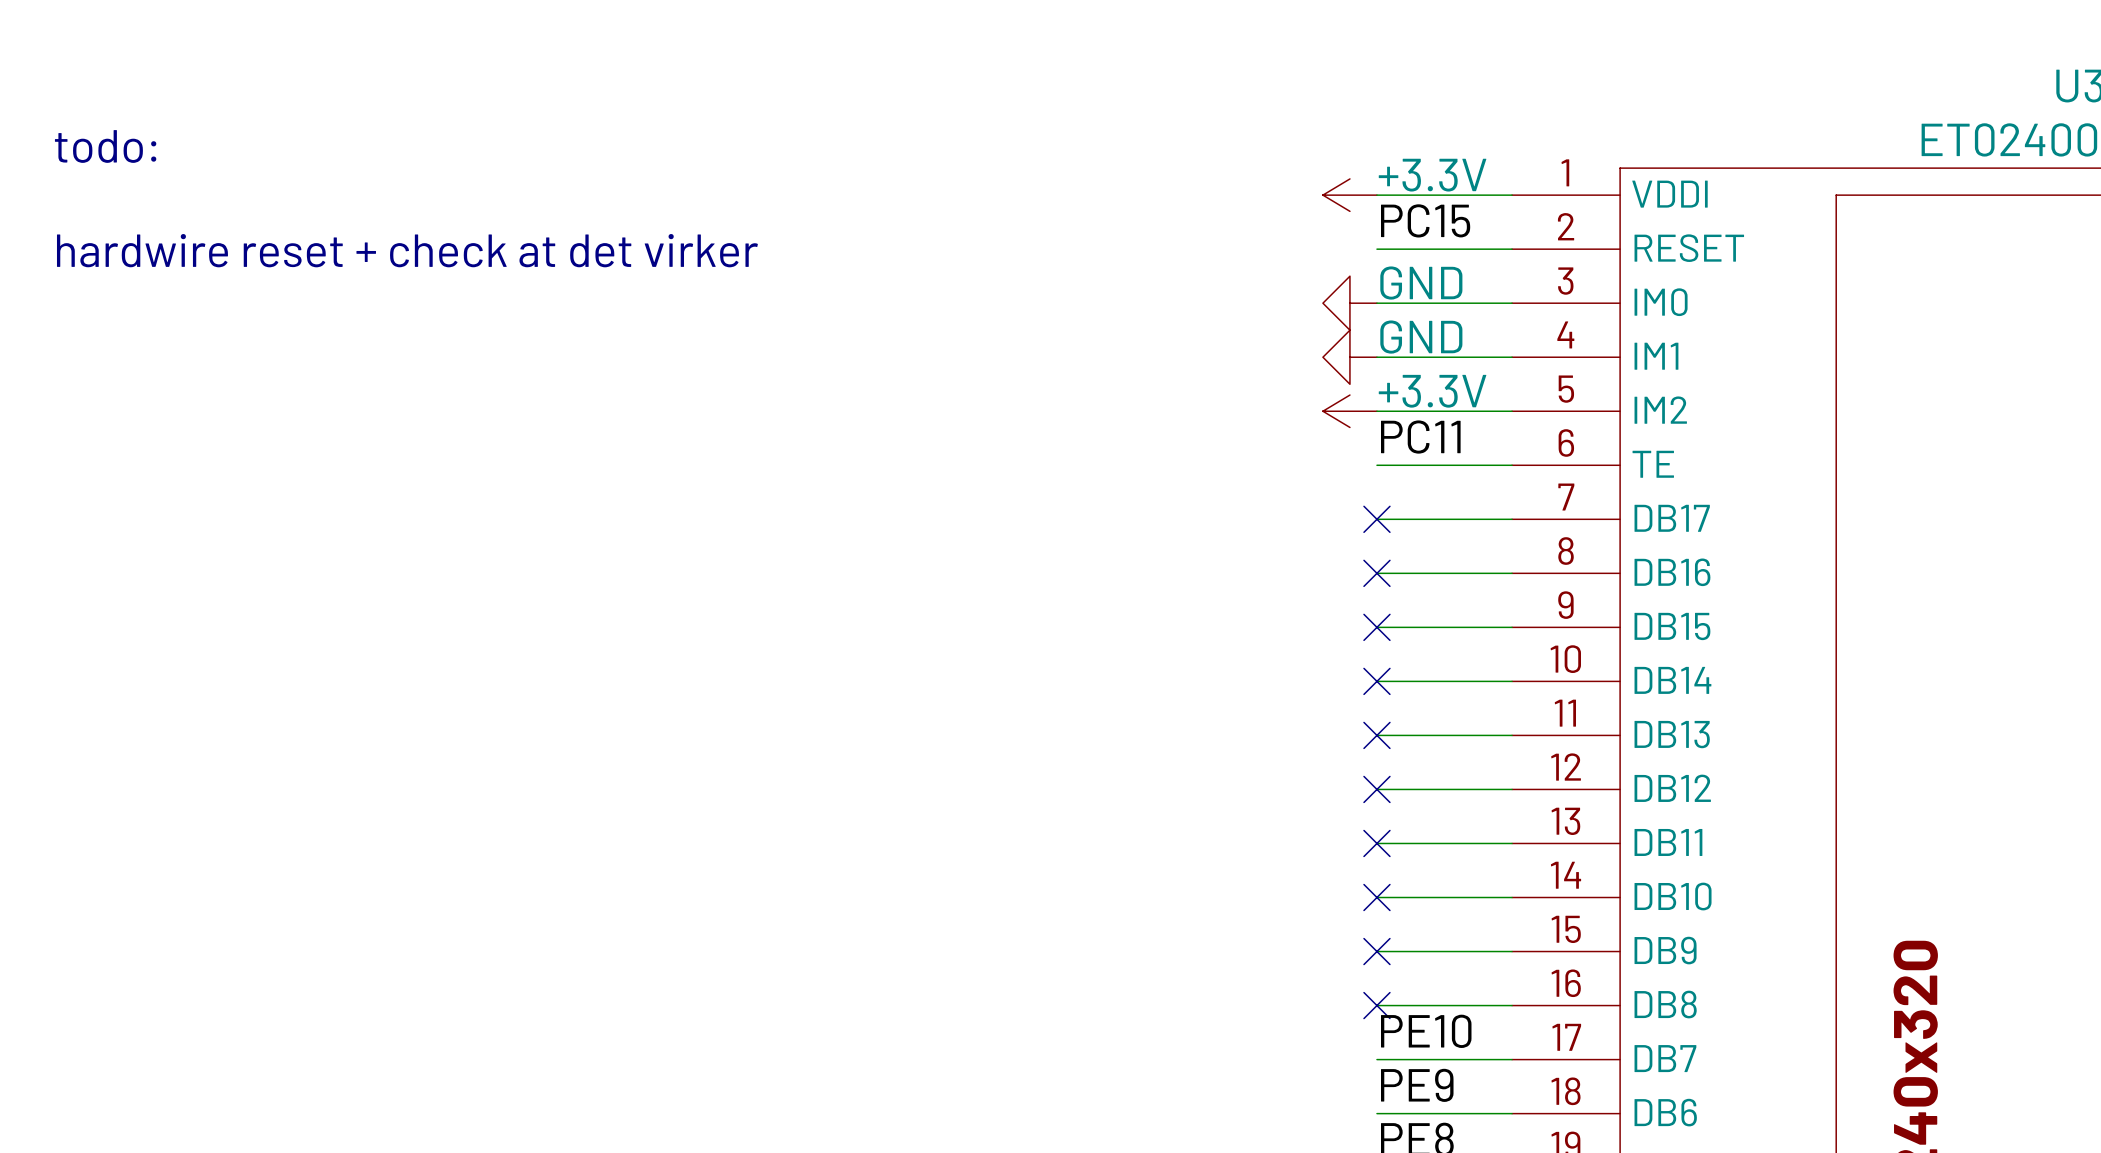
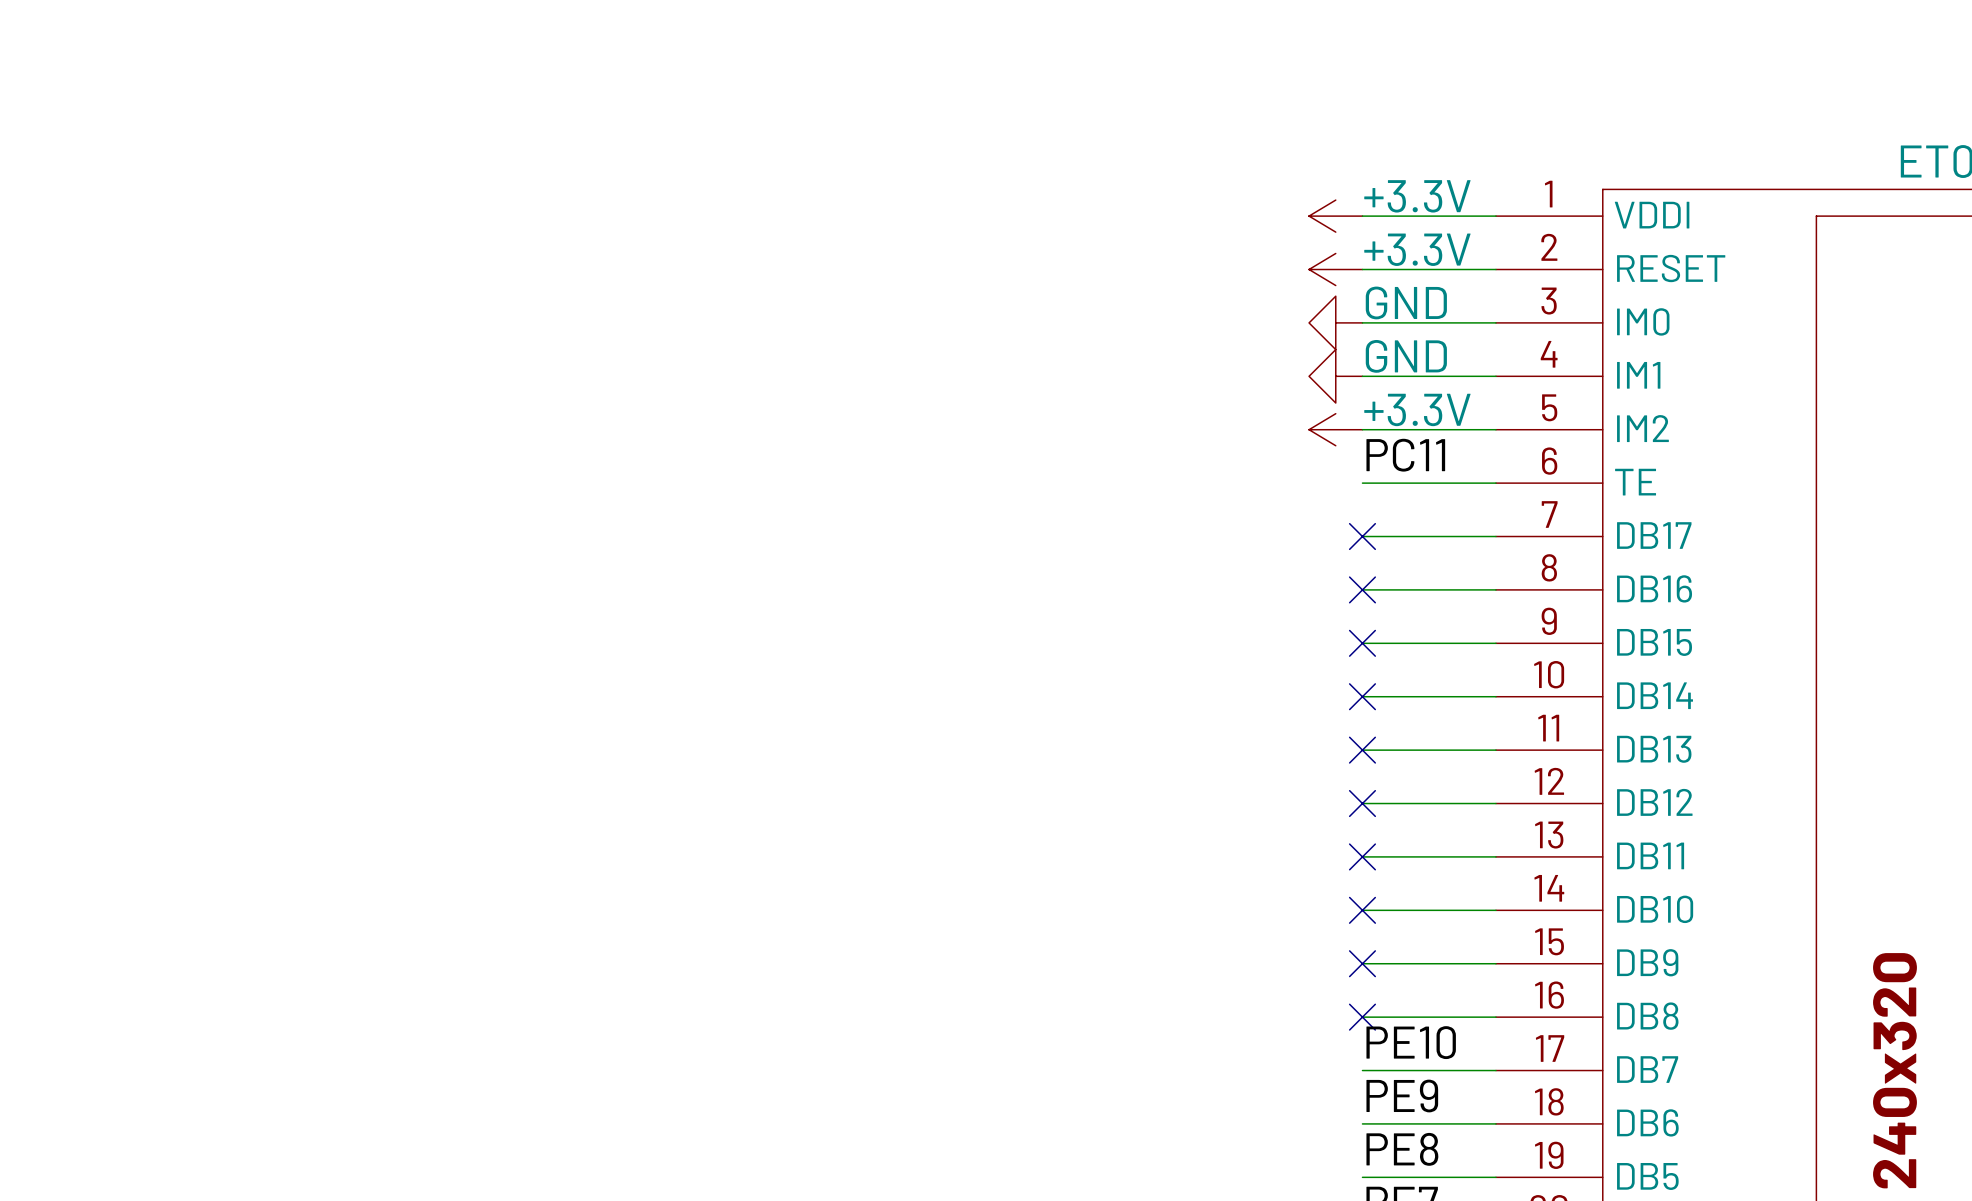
text: todo: (105, 146) -> none
label: PC15 (1425, 220) -> none
power symbol: none -> +3.3V (1335, 269)
text: hardwire reset + check at det virker (407, 250) -> none

